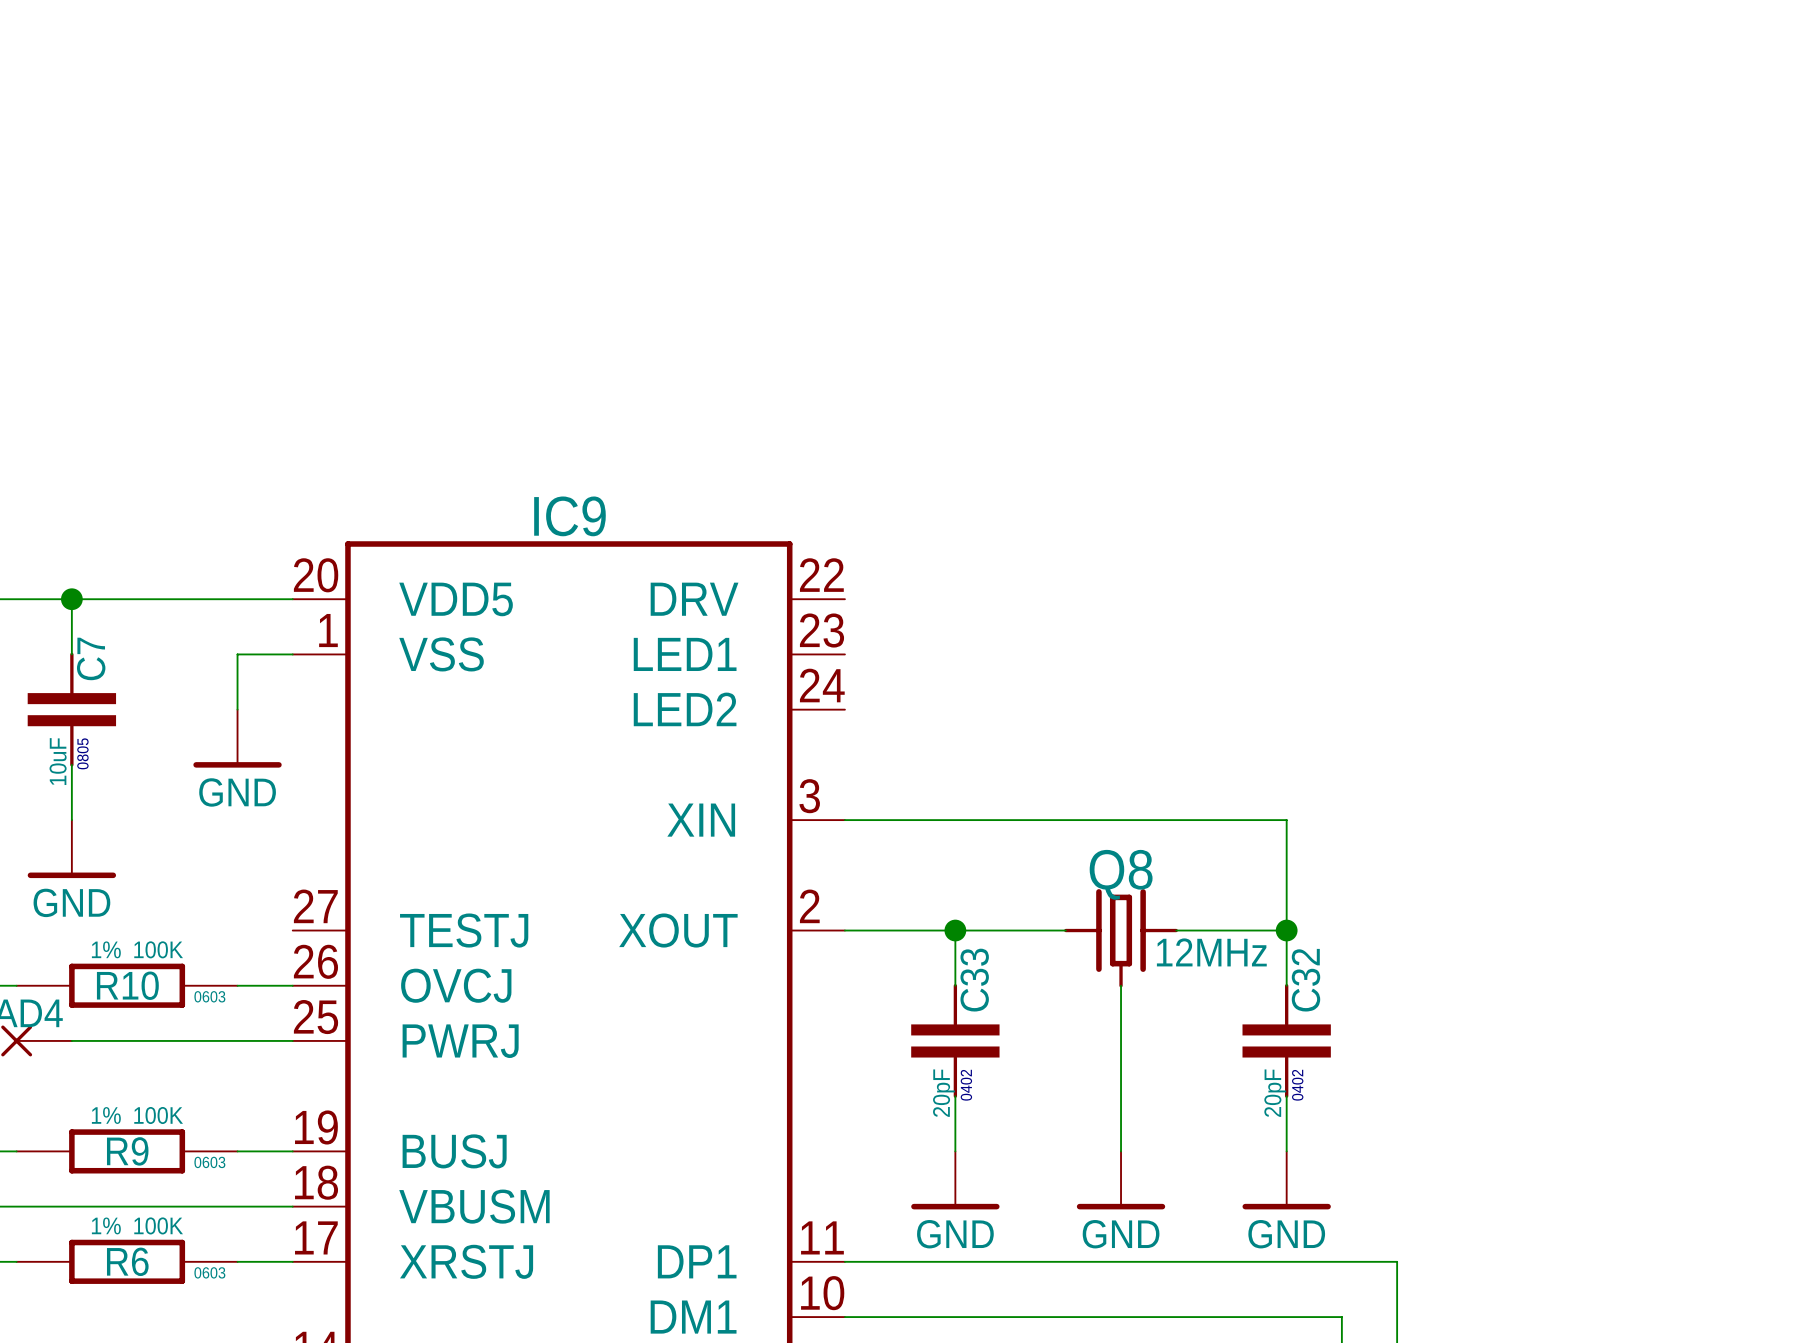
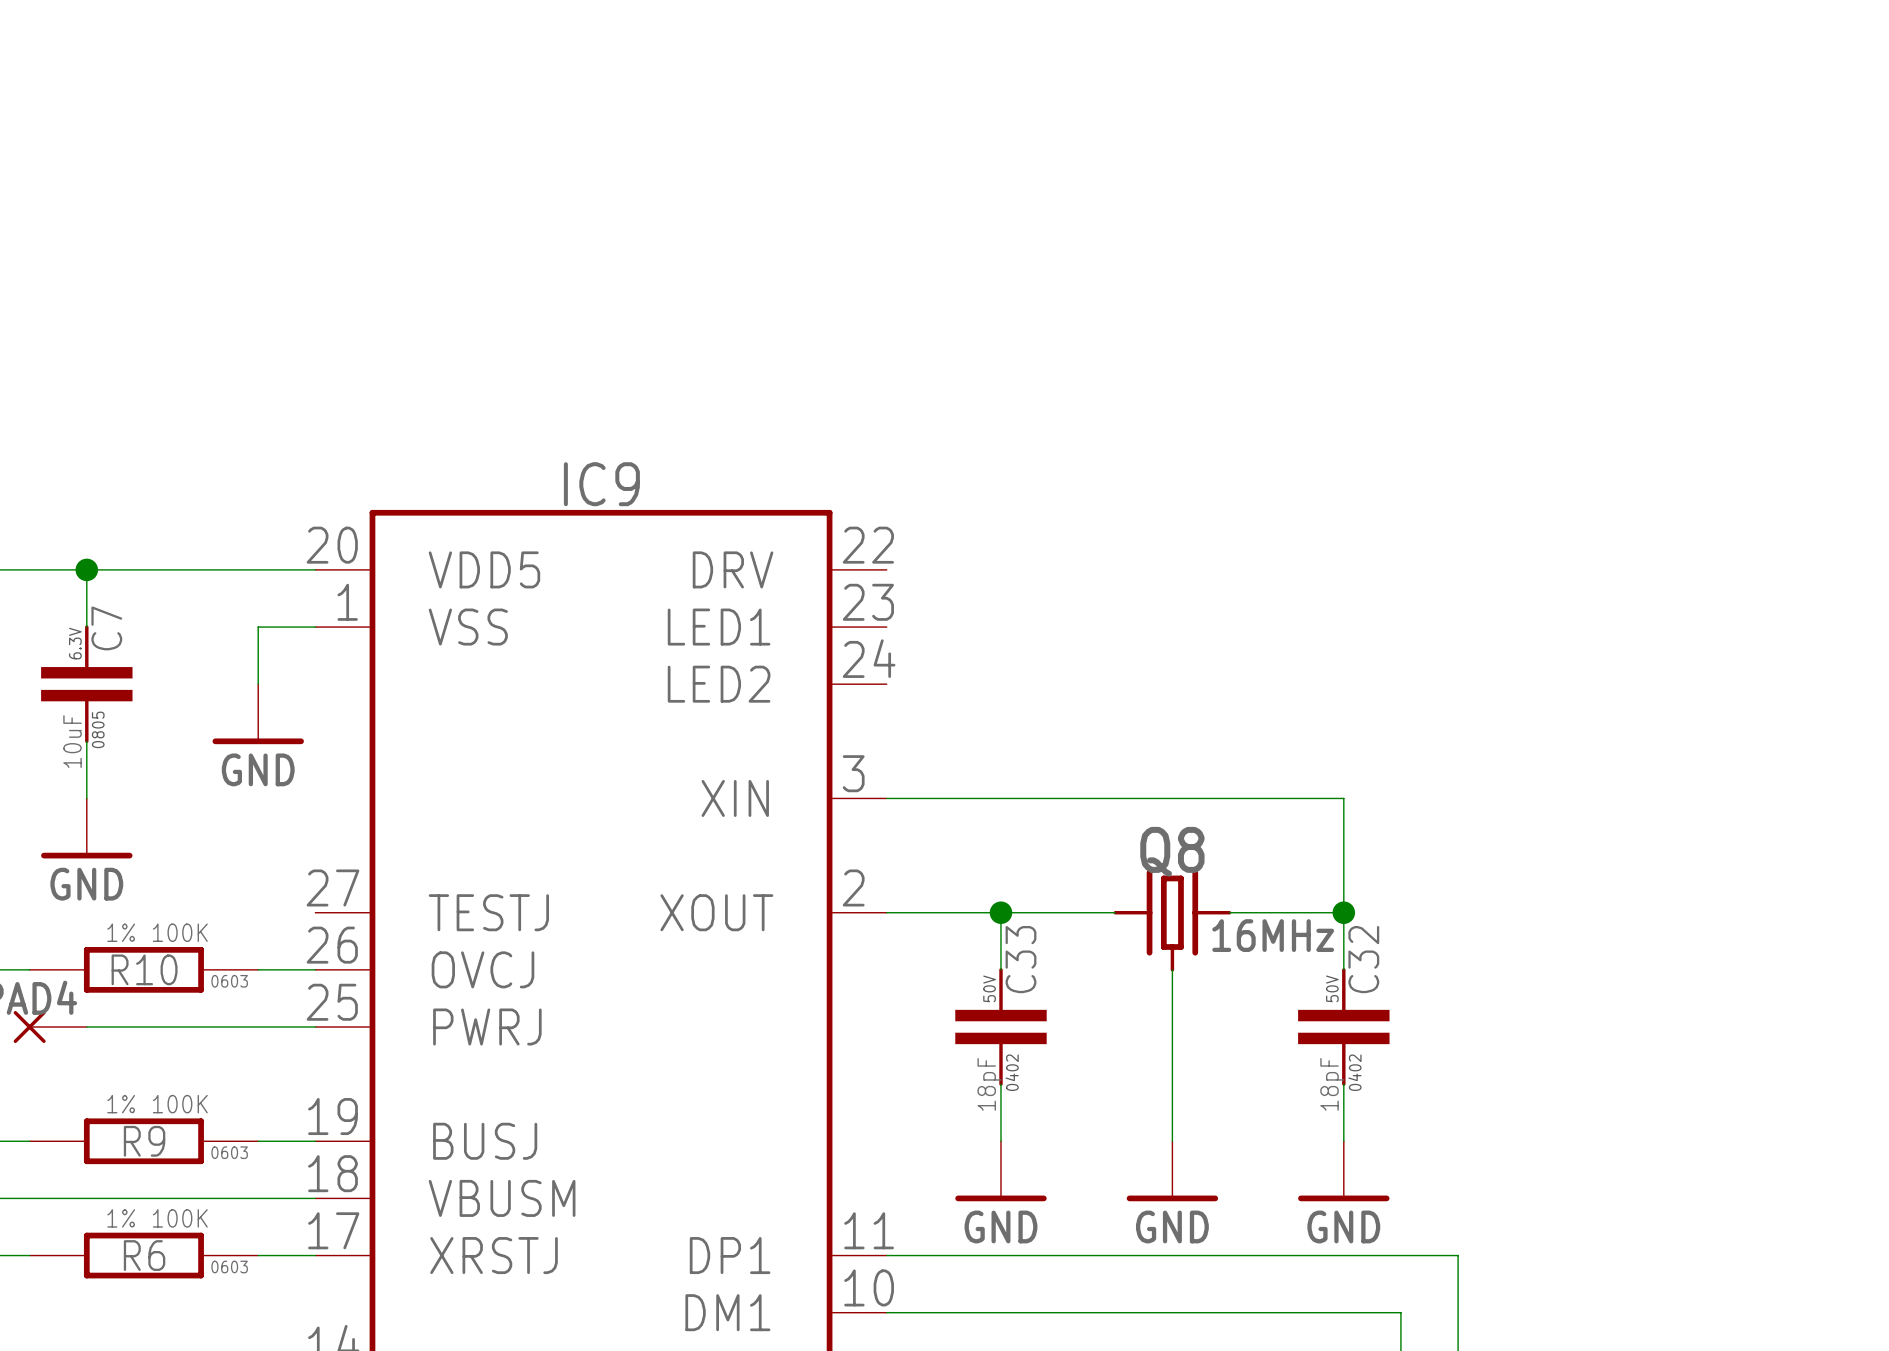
C7 text: none -> 6.3V (75, 643)
Q8 value: 12MHz (1211, 952) -> 16MHz (1273, 935)
C33 text: none -> 50V (989, 988)
C32 text: none -> 50V (1332, 988)
C33 value: 20pF (943, 1093) -> 18pF (989, 1084)
C32 value: 20pF (1275, 1093) -> 18pF (1332, 1084)

